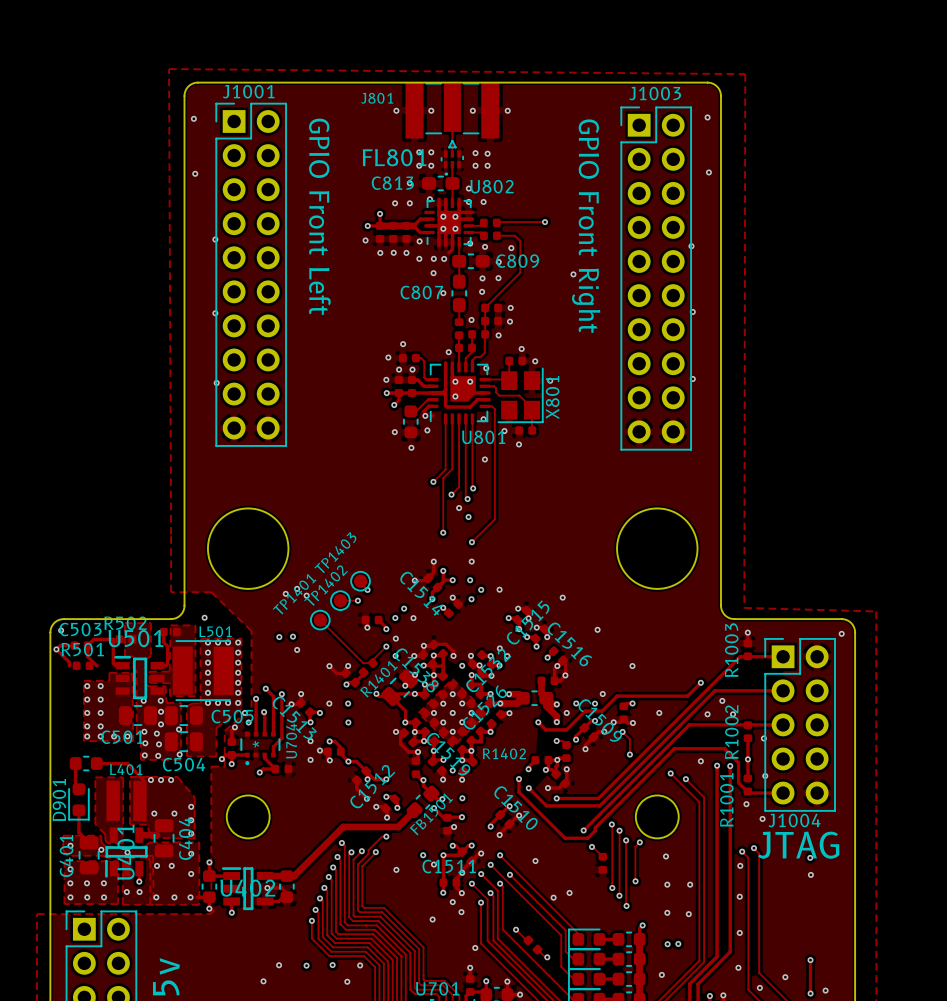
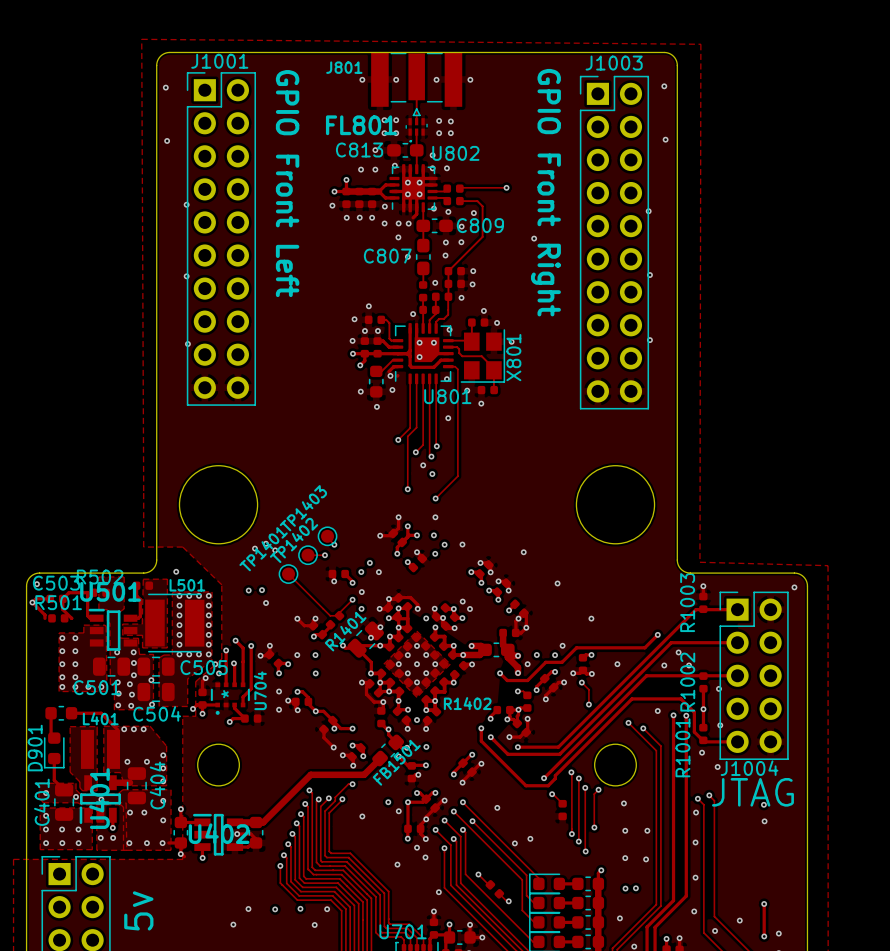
C1514 name: C1514 (421, 593) -> none
C1515 name: C1515 (528, 622) -> none
C1516 name: C1516 (570, 644) -> none
C1538 name: C1538 (416, 670) -> none
C1532 name: C1532 (488, 670) -> none
C1526 name: C1526 (484, 707) -> none
C1513 name: C1513 (294, 717) -> none
C1509 name: C1509 (600, 720) -> none
C1519 name: C1519 (448, 754) -> none
C1512 name: C1512 (372, 786) -> none
C1510 name: C1510 (515, 807) -> none
C1511 name: C1511 (449, 866) -> none

